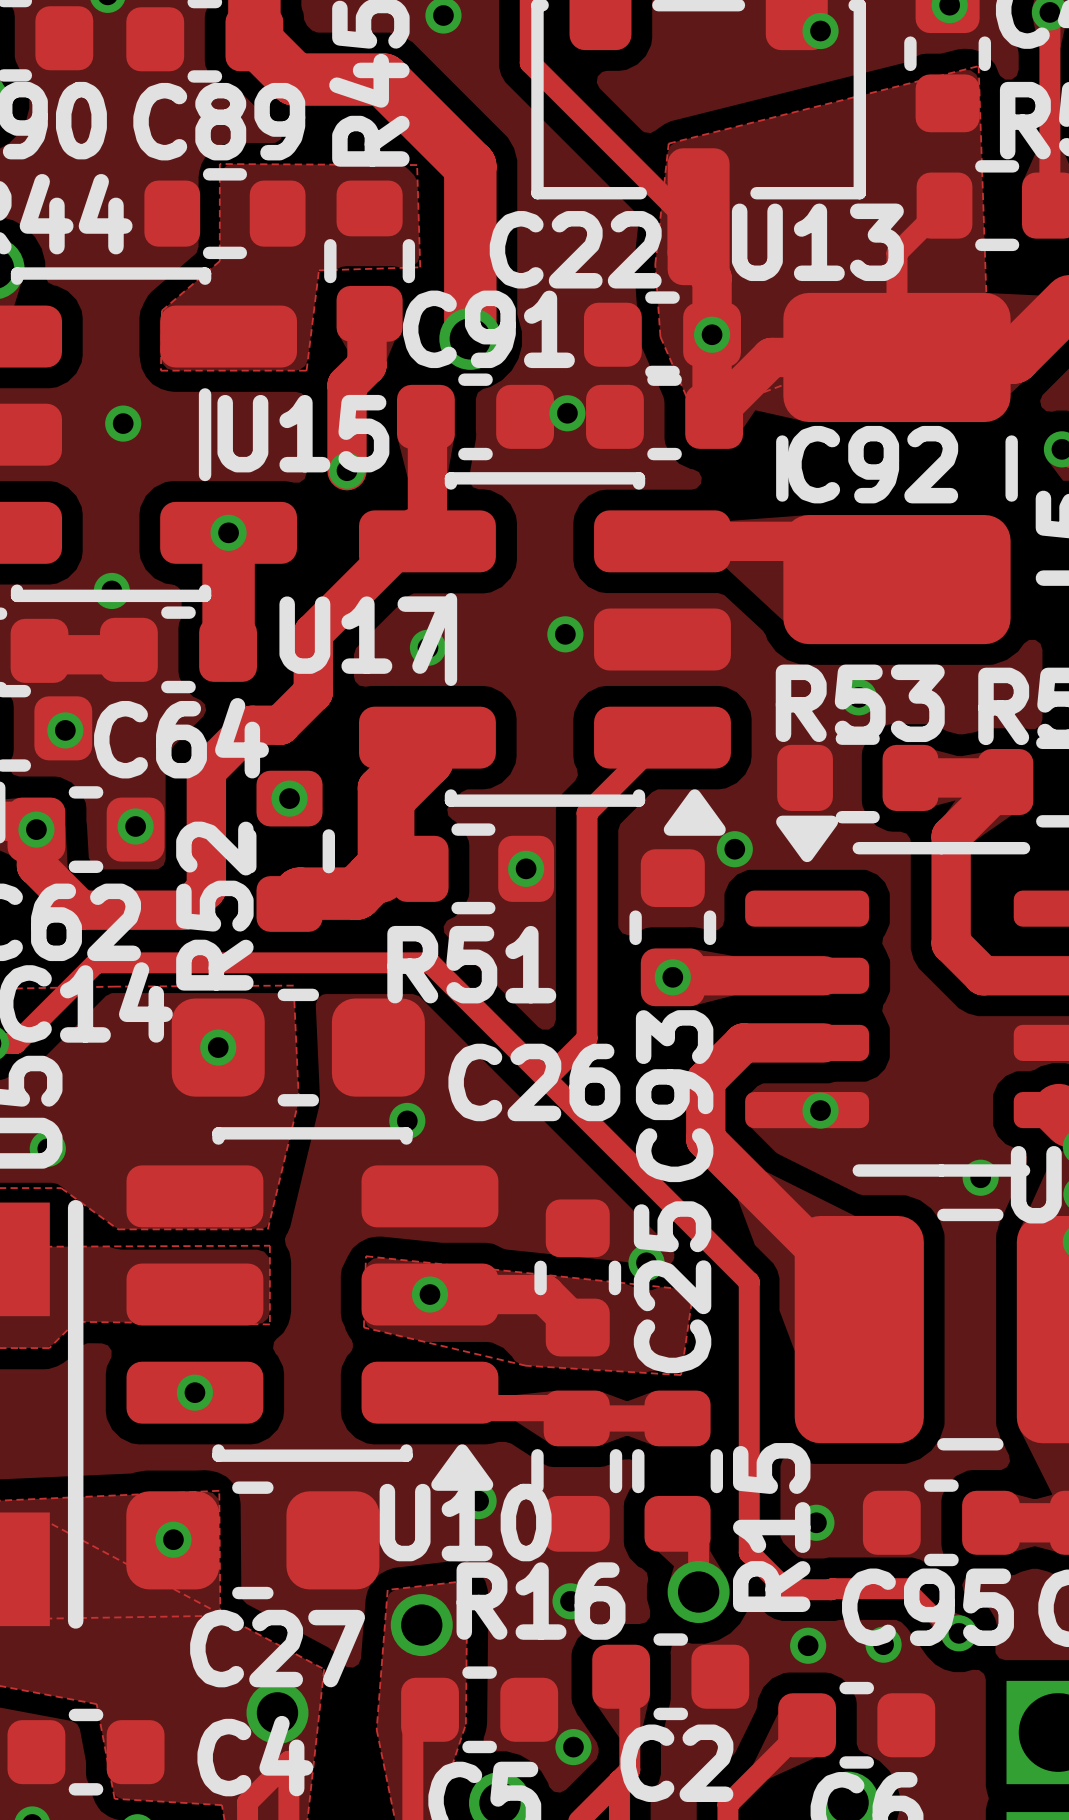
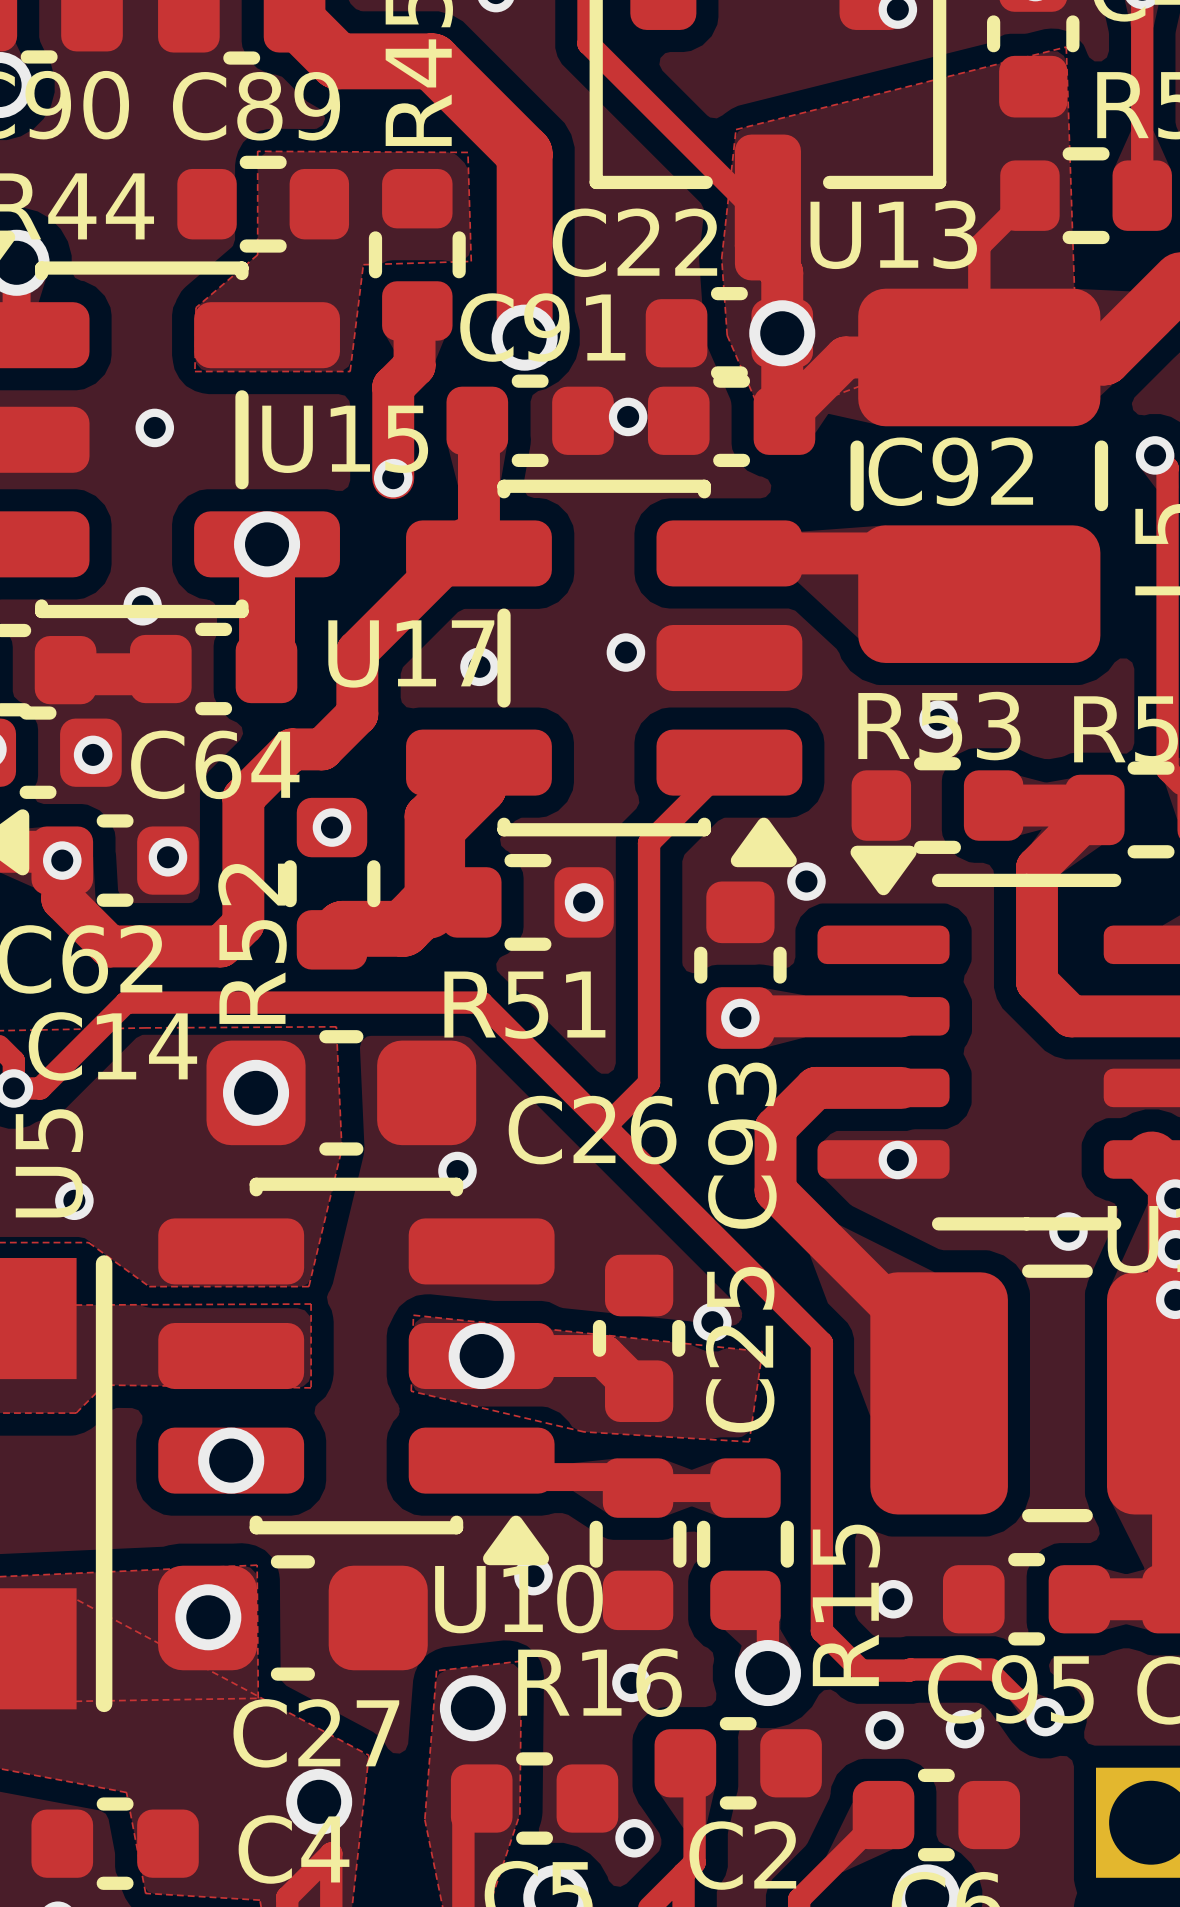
via size: [693, 316, 731, 353] -> [749, 300, 816, 367]
via size: [210, 514, 247, 551] -> [234, 511, 301, 578]
via size: [200, 1029, 237, 1066] -> [223, 1059, 290, 1126]
via size: [411, 1276, 449, 1313] -> [448, 1322, 515, 1390]
via size: [176, 1374, 214, 1411] -> [198, 1427, 265, 1494]
via size: [155, 1521, 192, 1558] -> [175, 1584, 242, 1651]

